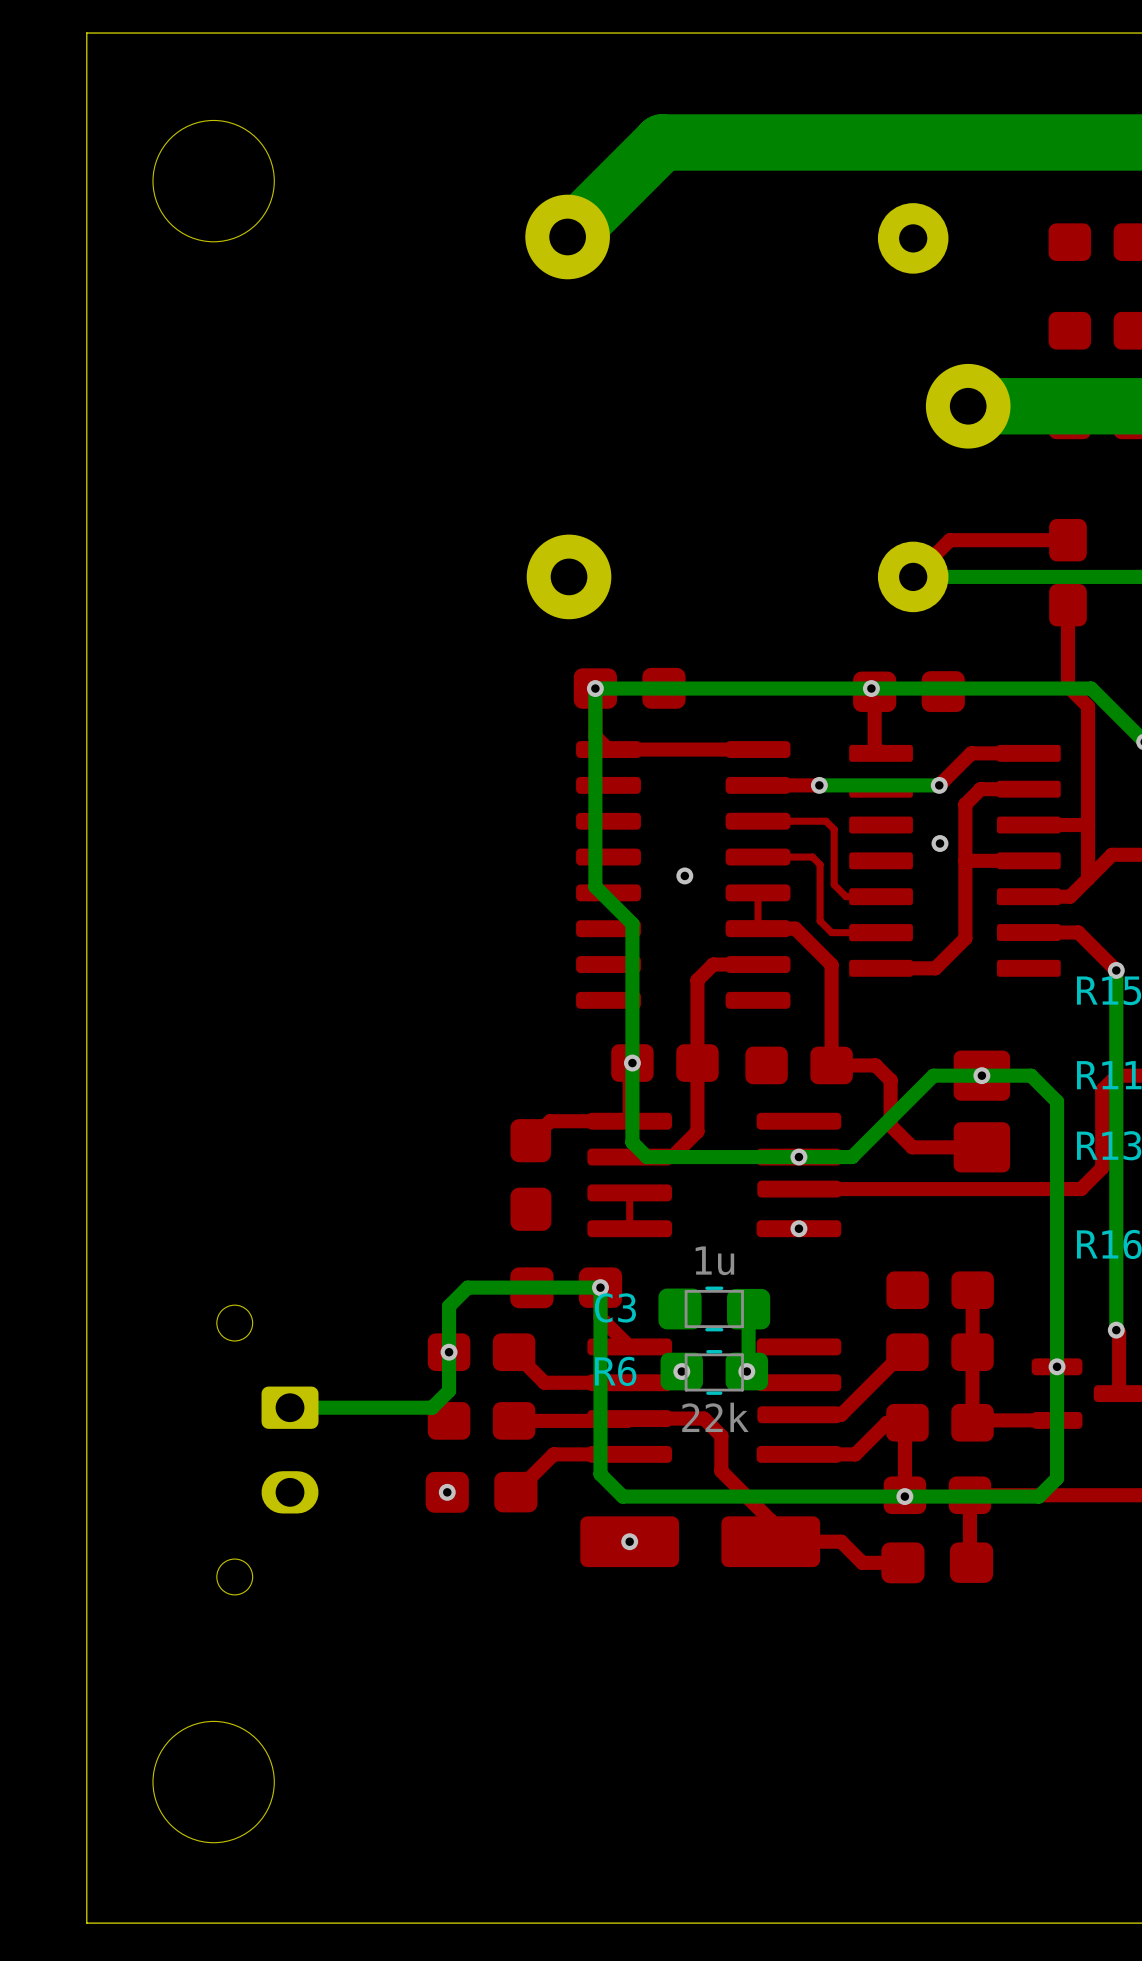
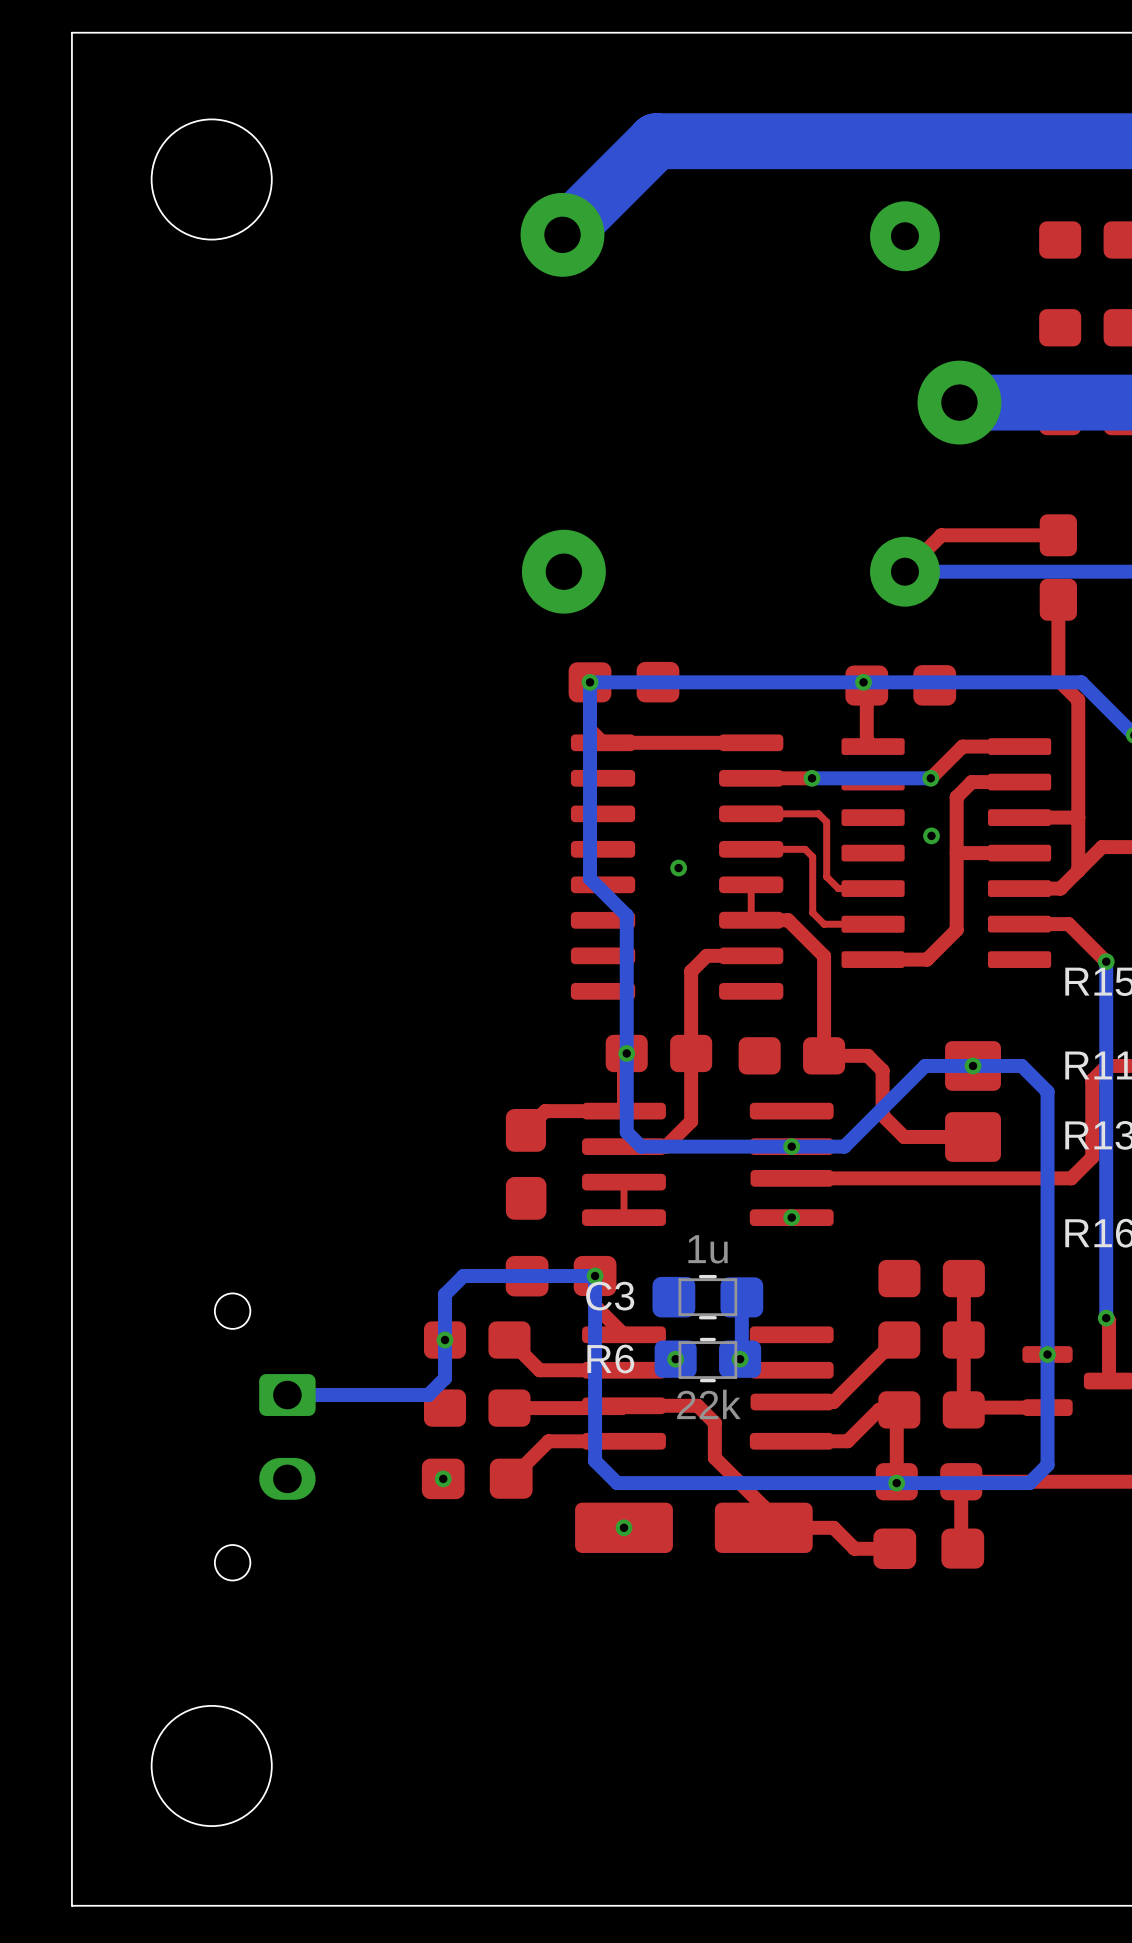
board edge: (86, 33) (86, 1923) -> (85, 32) (71, 32) (71, 1905) (85, 1905)

